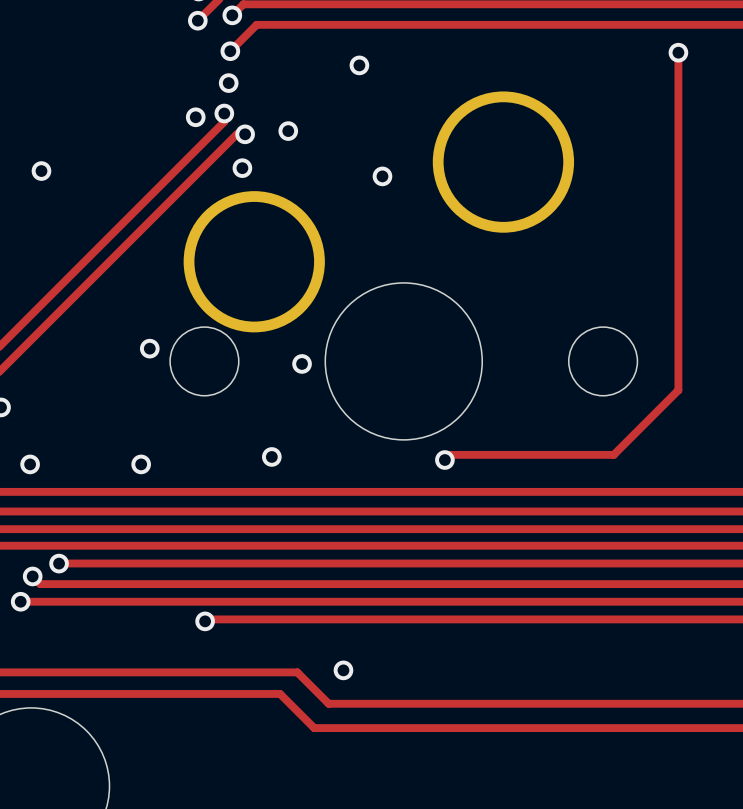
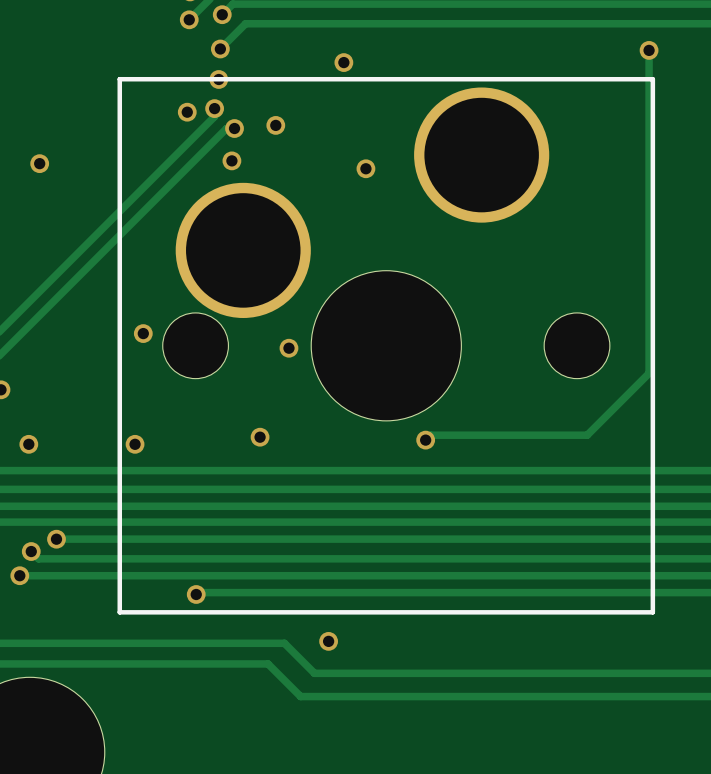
part: none -> (386, 345)

